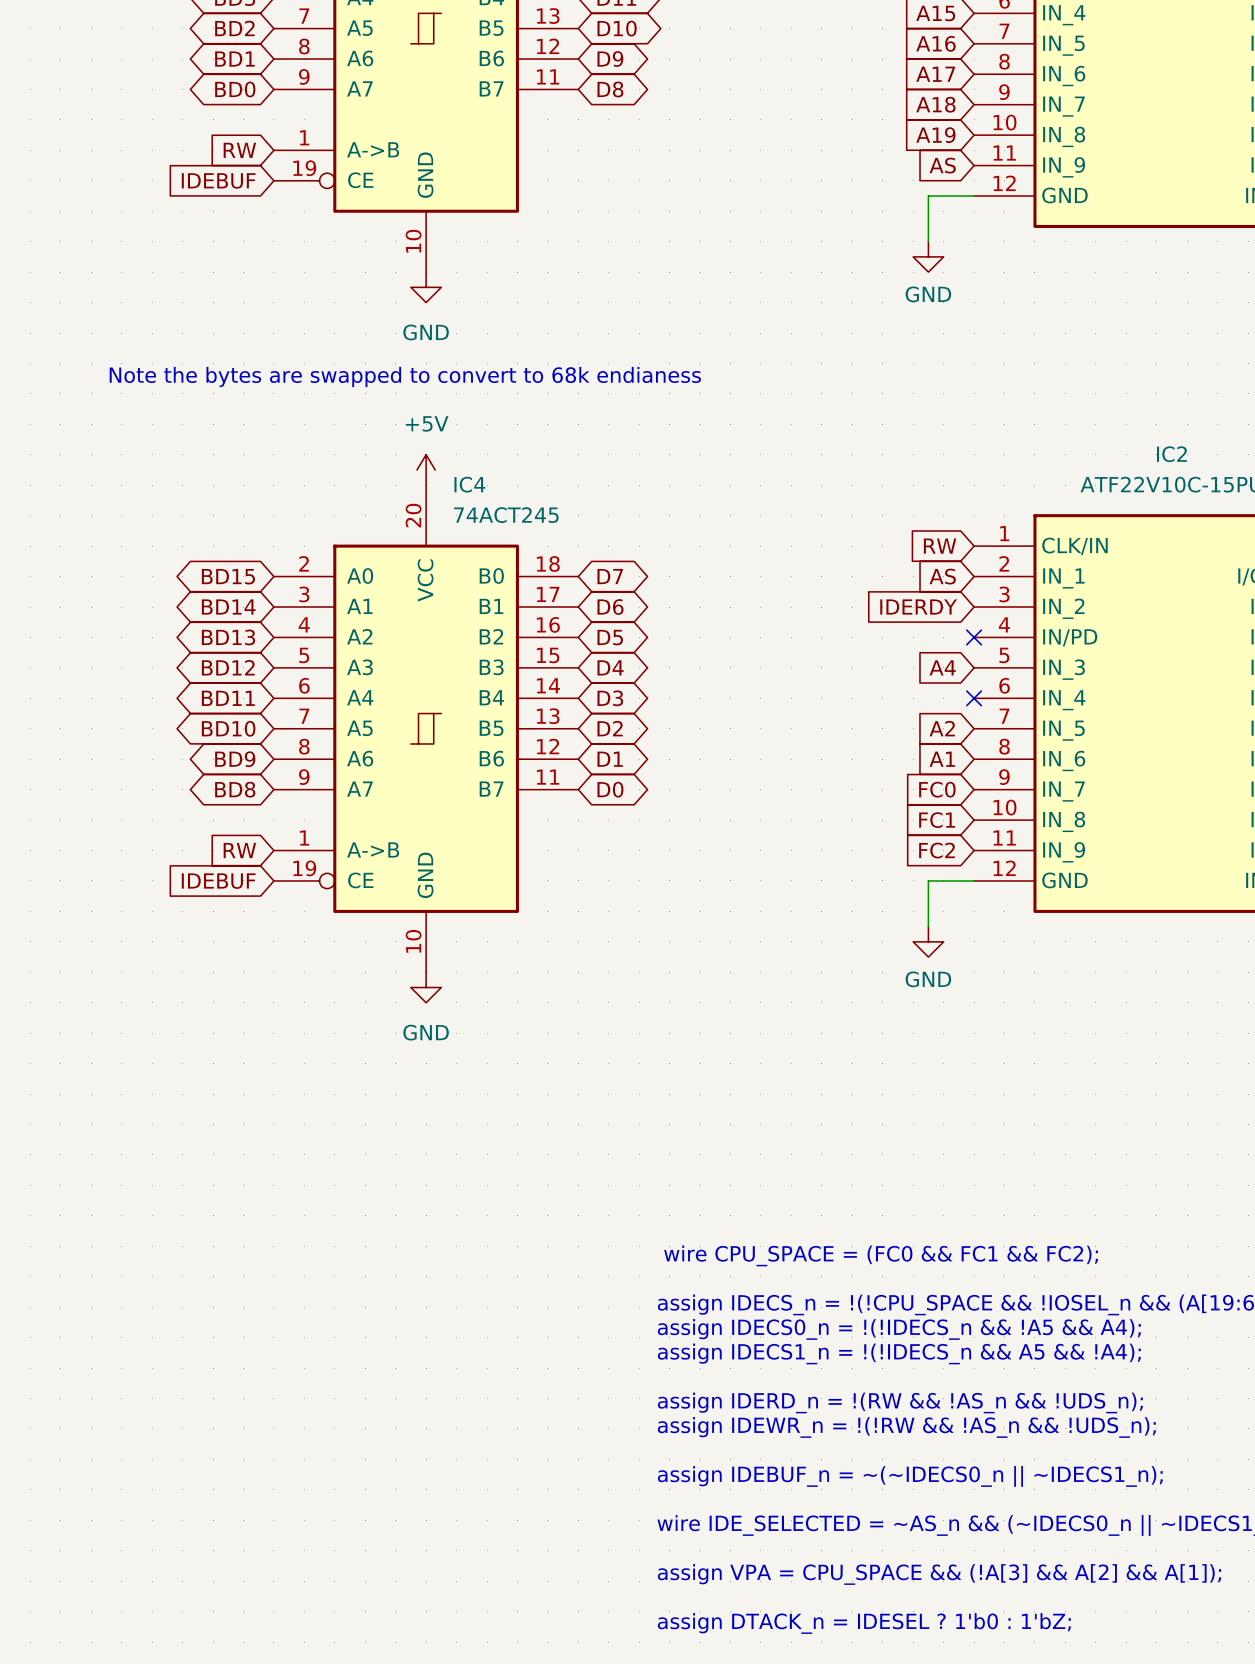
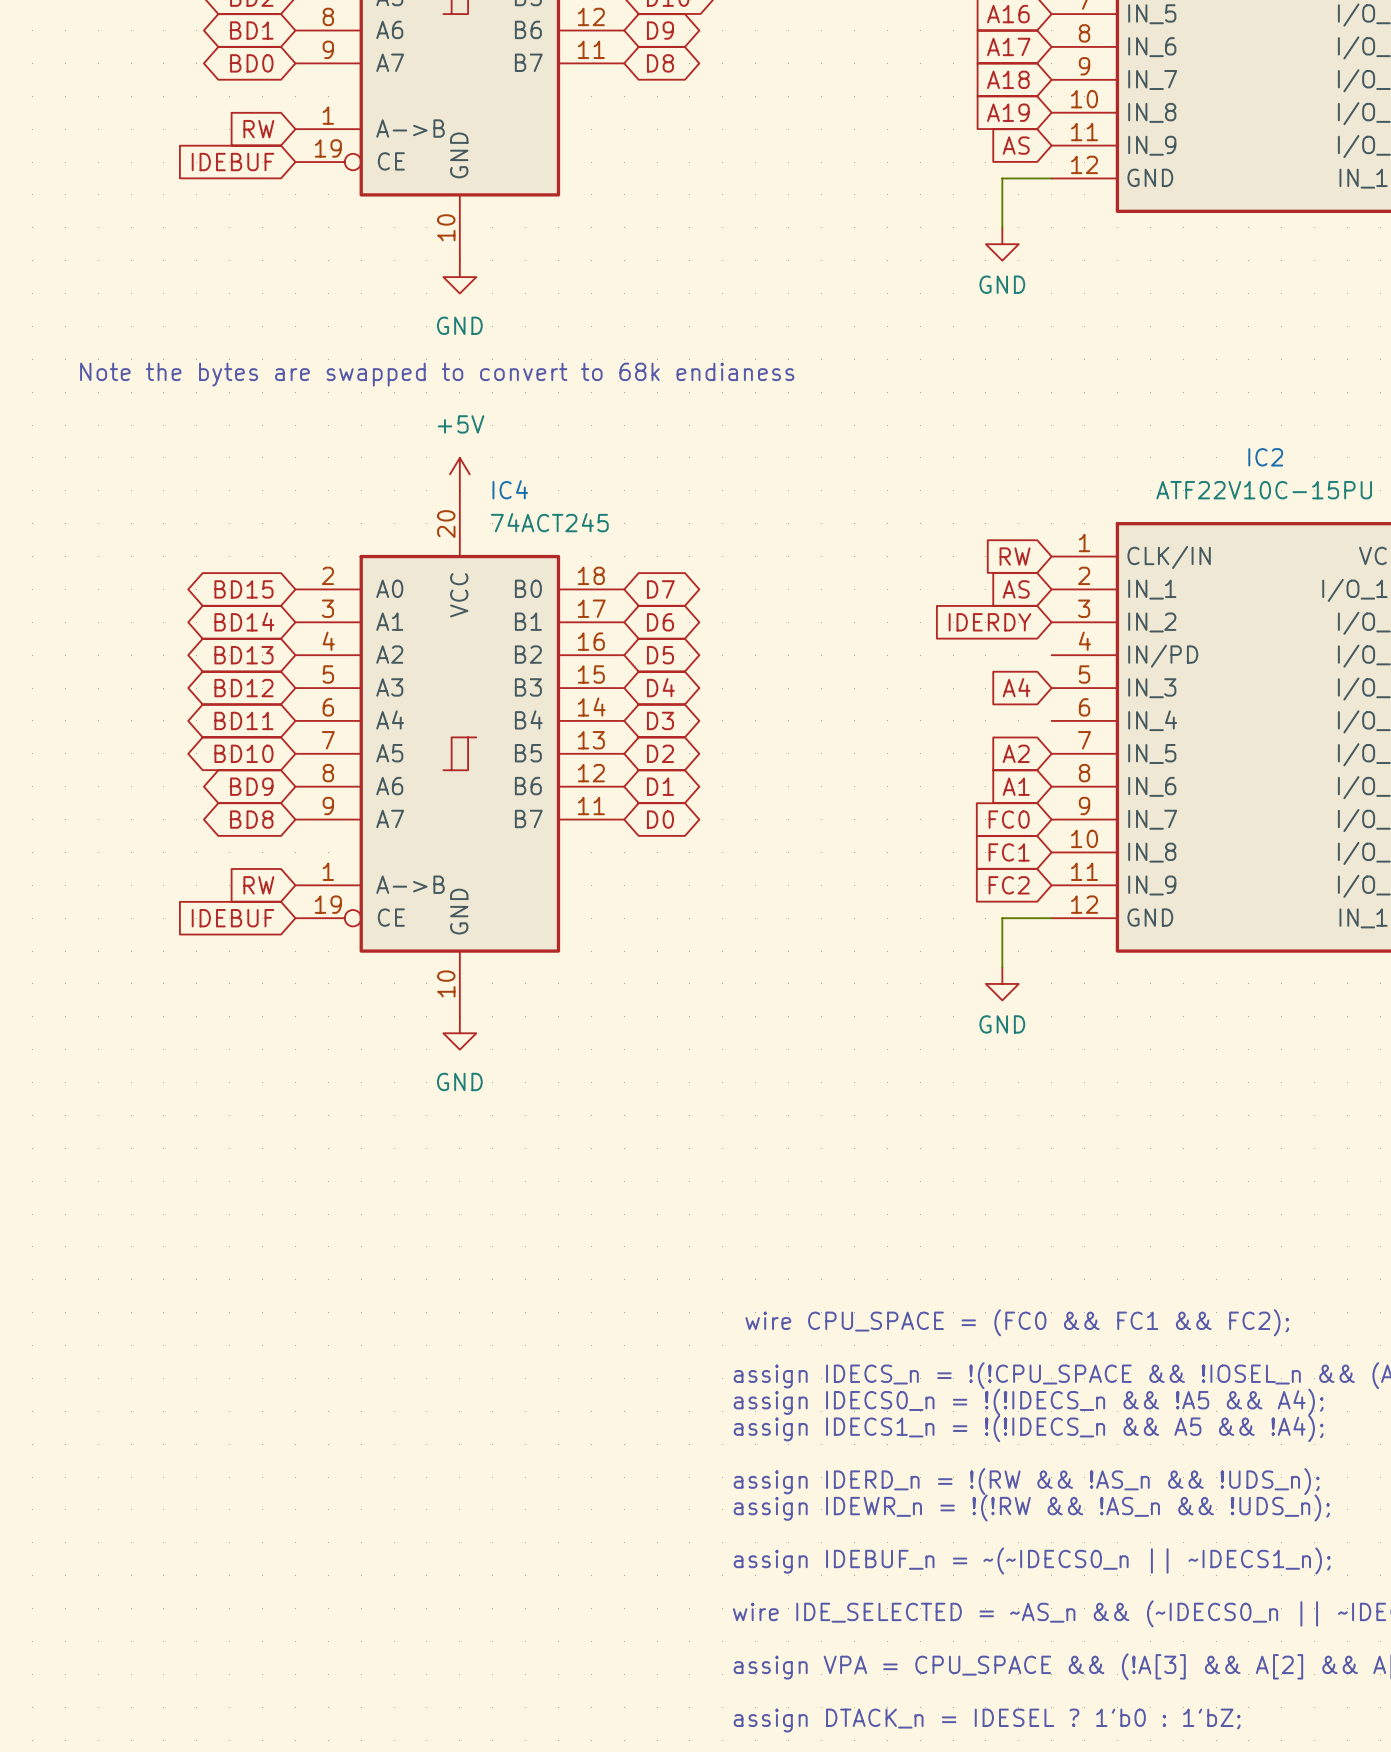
no-connect mark: (974, 637) -> none
no-connect mark: (974, 698) -> none

